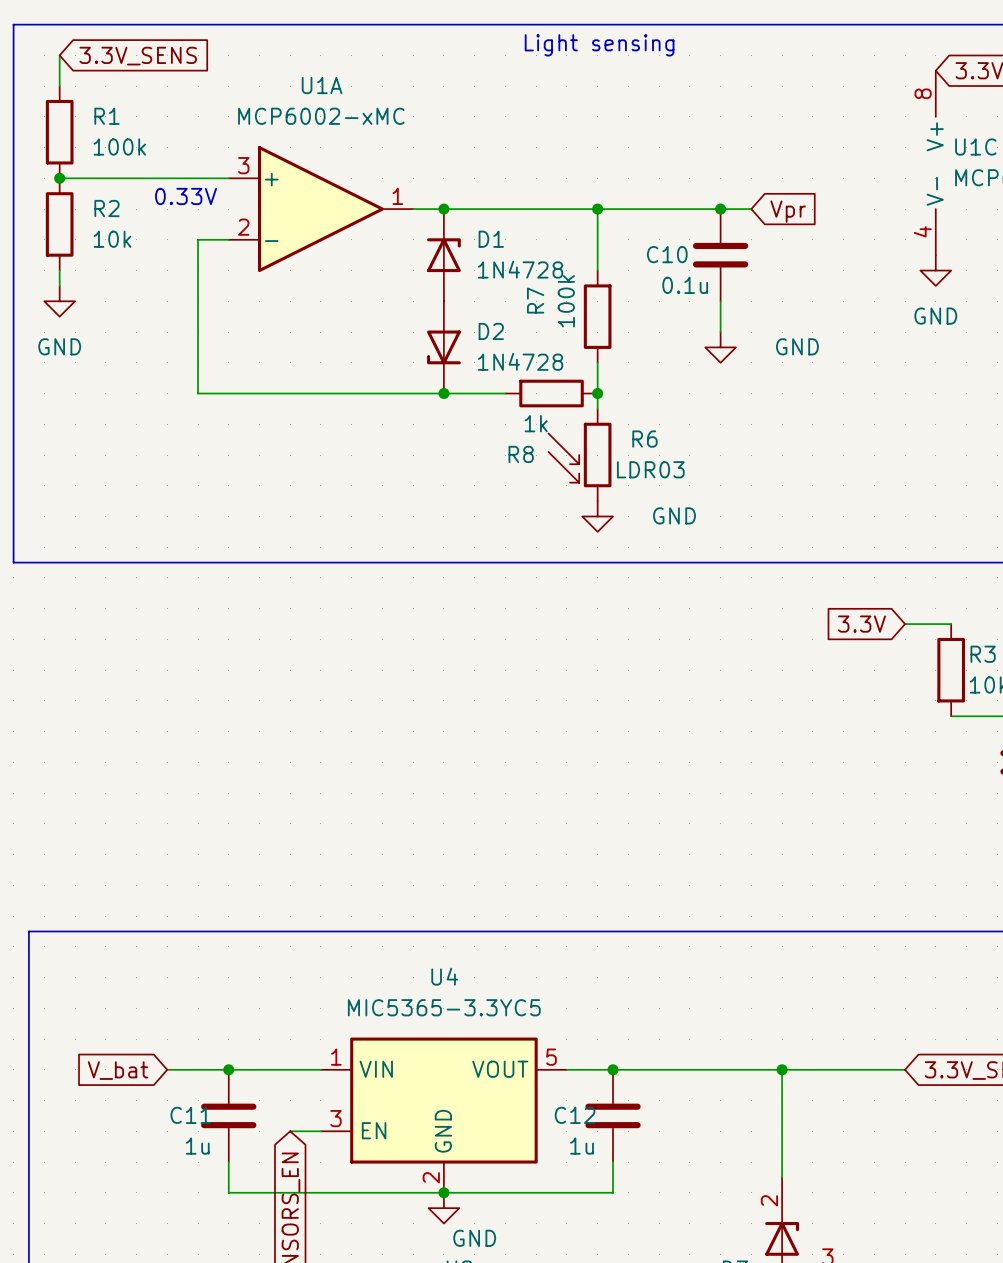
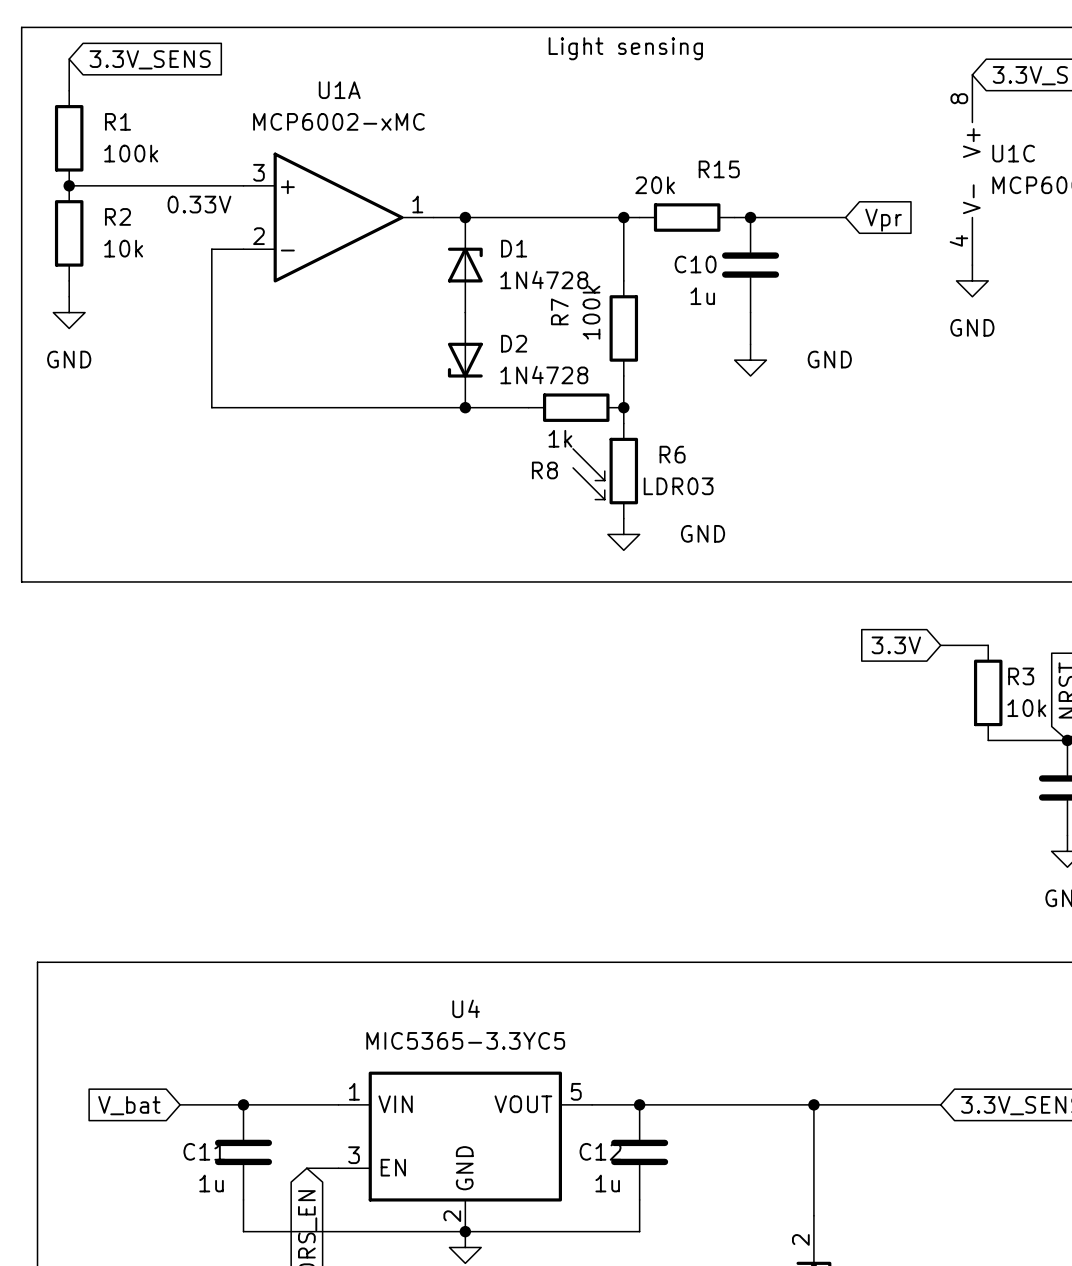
wire: (613, 209) (705, 209) -> none
R15: none -> 20k (687, 217)
wire: none -> (782, 217) (845, 217)
global label position: Vpr (788, 211) -> Vpr (883, 220)
C10 value: 0.1u (685, 285) -> 1u (702, 296)

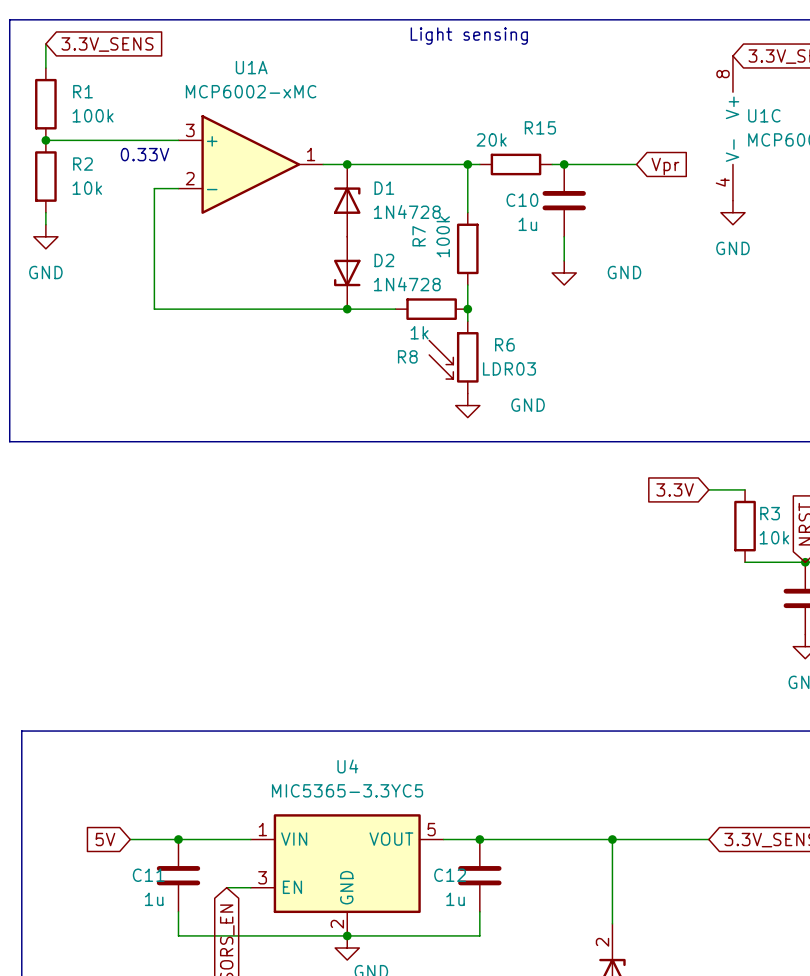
global label: V_bat (129, 1105) -> 5V (105, 839)

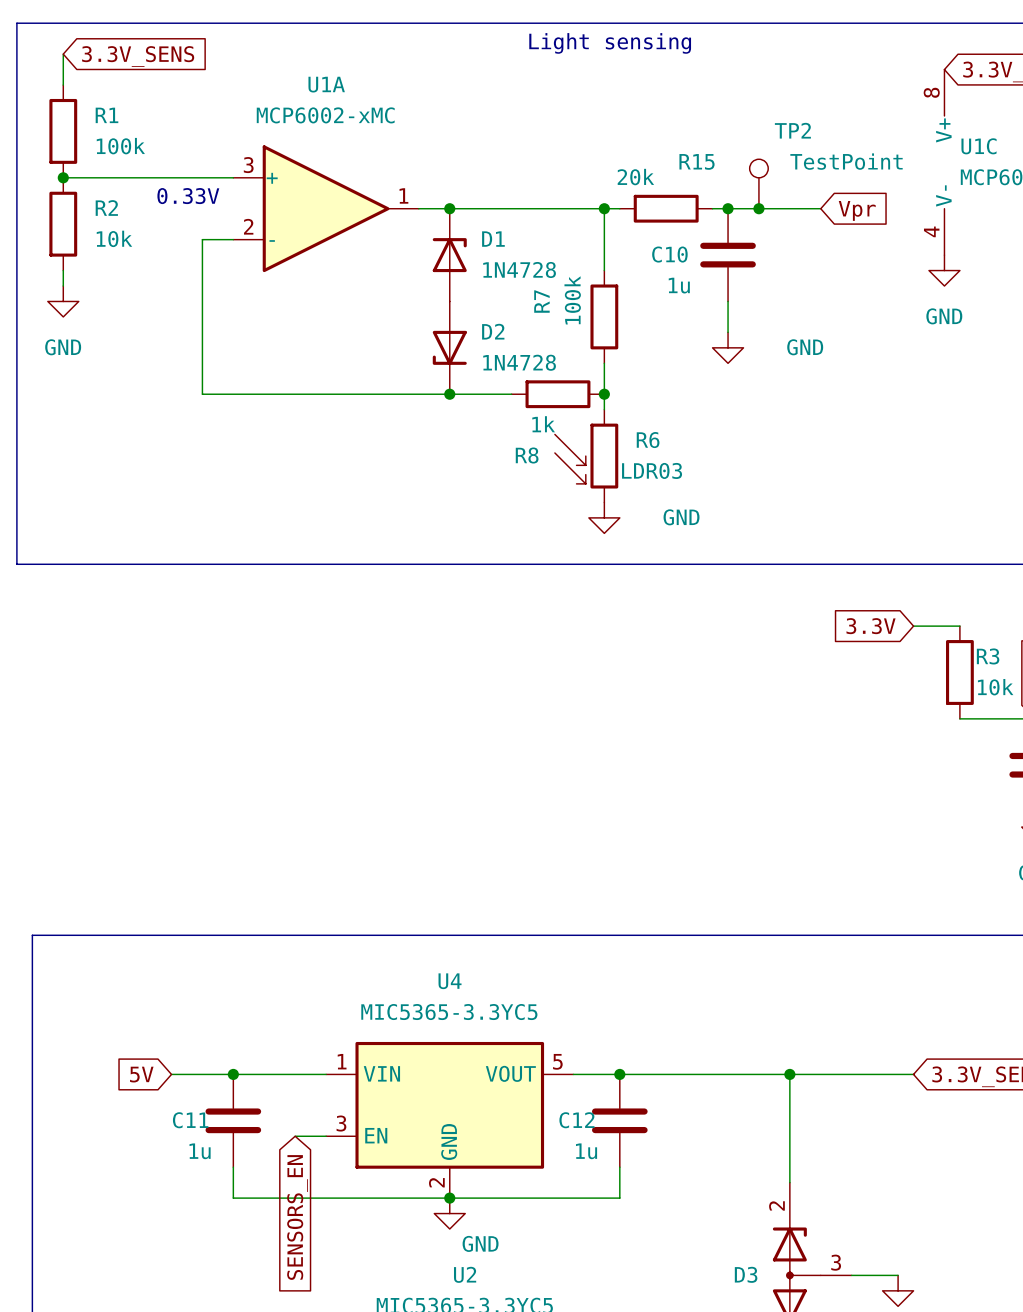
TP2: none -> TestPoint (758, 183)
junction: none -> (758, 208)

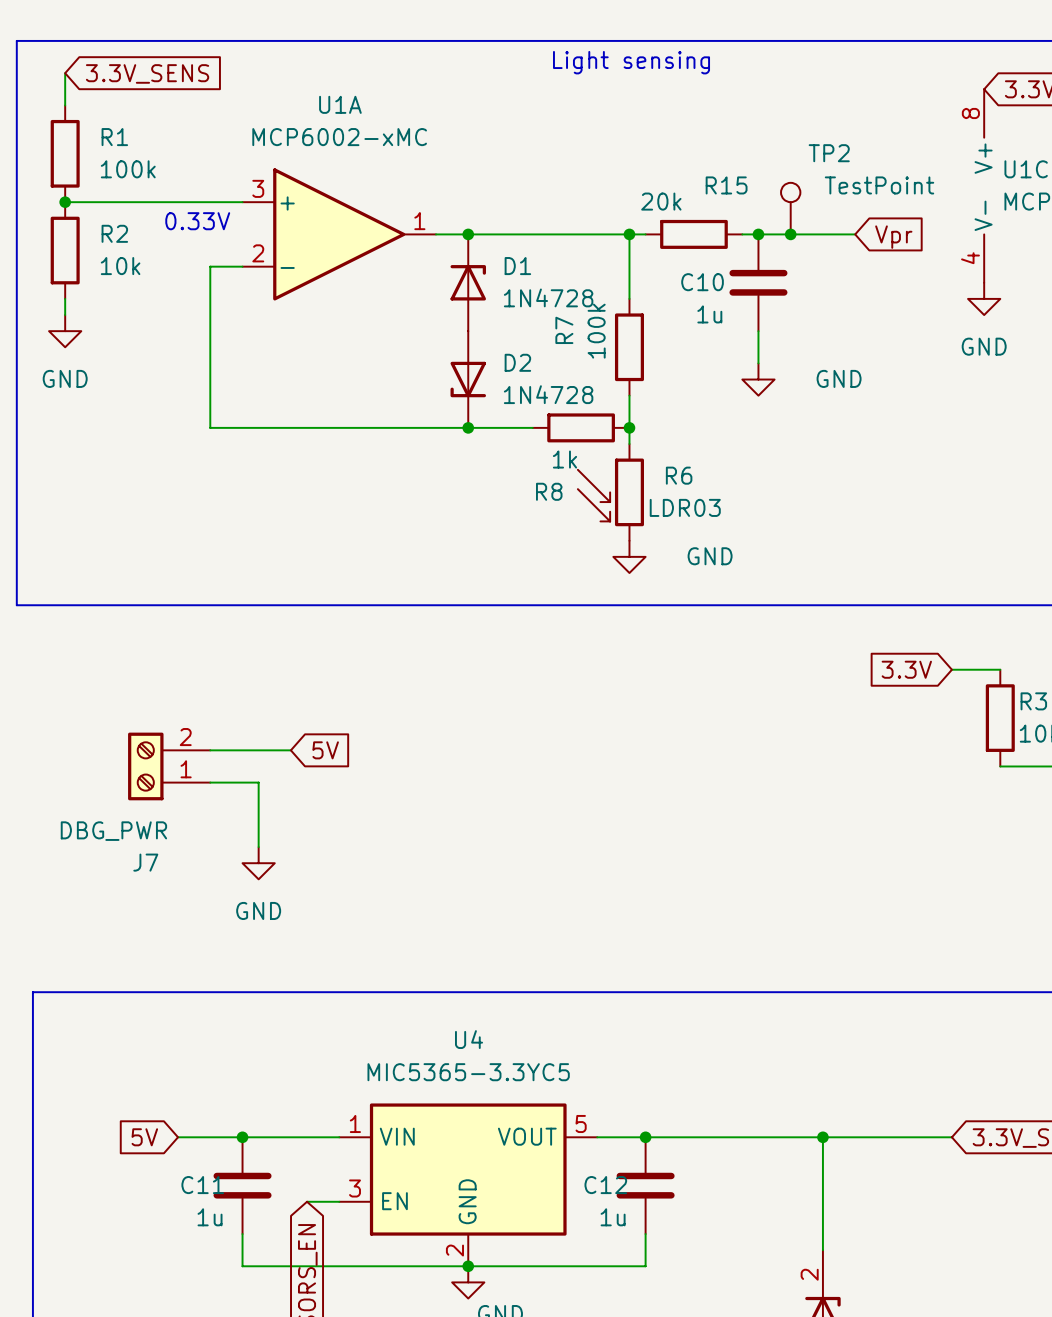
wire: none -> (210, 750) (290, 750)
global label: none -> 5V (325, 750)
J7: none -> DBG_PWR (169, 766)
wire: none -> (210, 782) (258, 782) (258, 847)
power symbol: none -> GND (258, 863)

